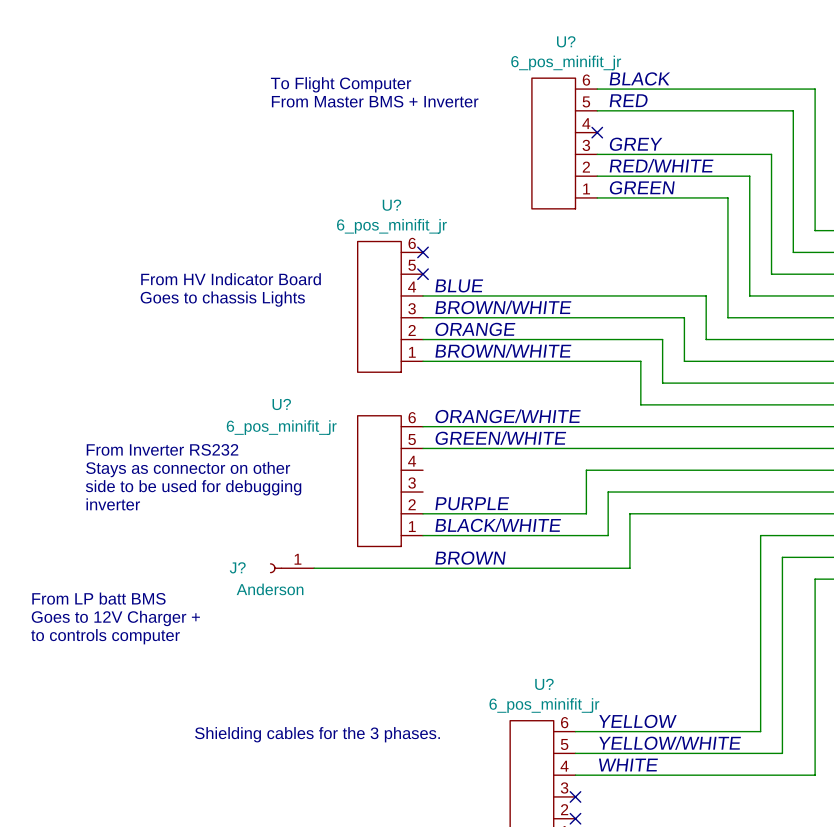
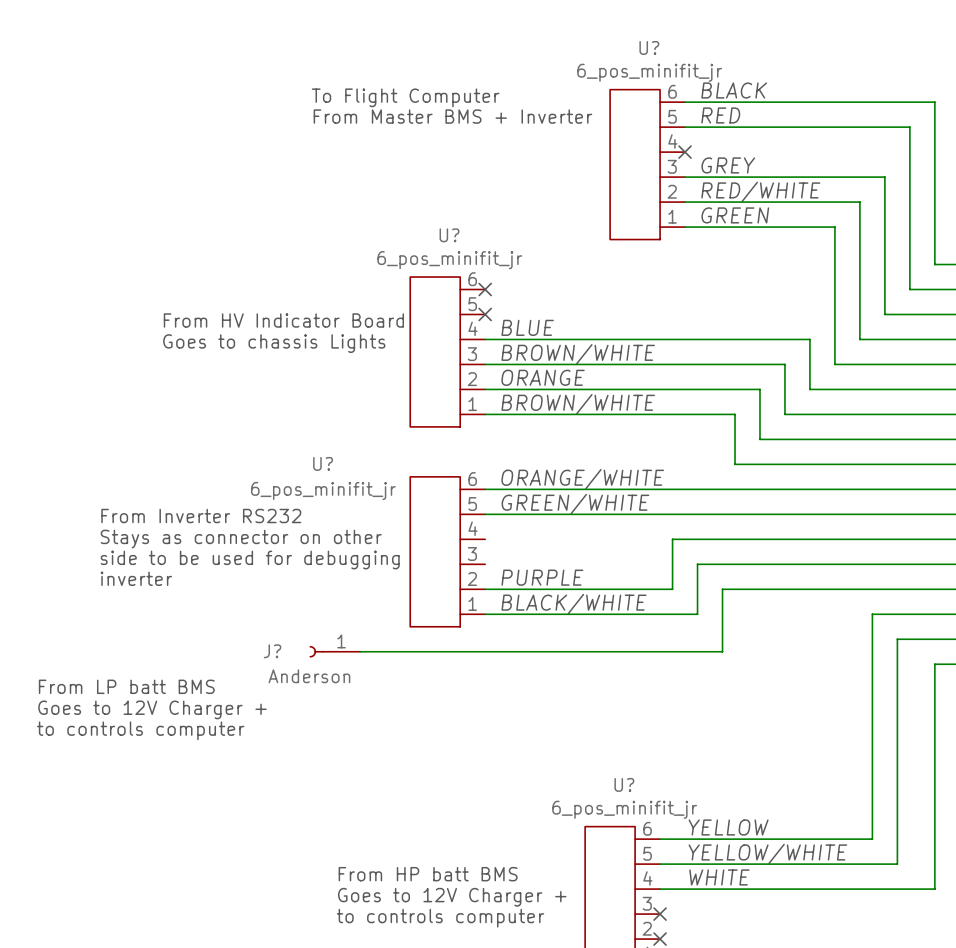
text: BROWN (470, 558) -> none
text: Shielding cables for the 3 phases. (317, 734) -> none
text: none -> From HP batt BMS (428, 874)
text: none -> Goes to 12V Charger + (452, 897)
text: none -> to controls computer (440, 918)

